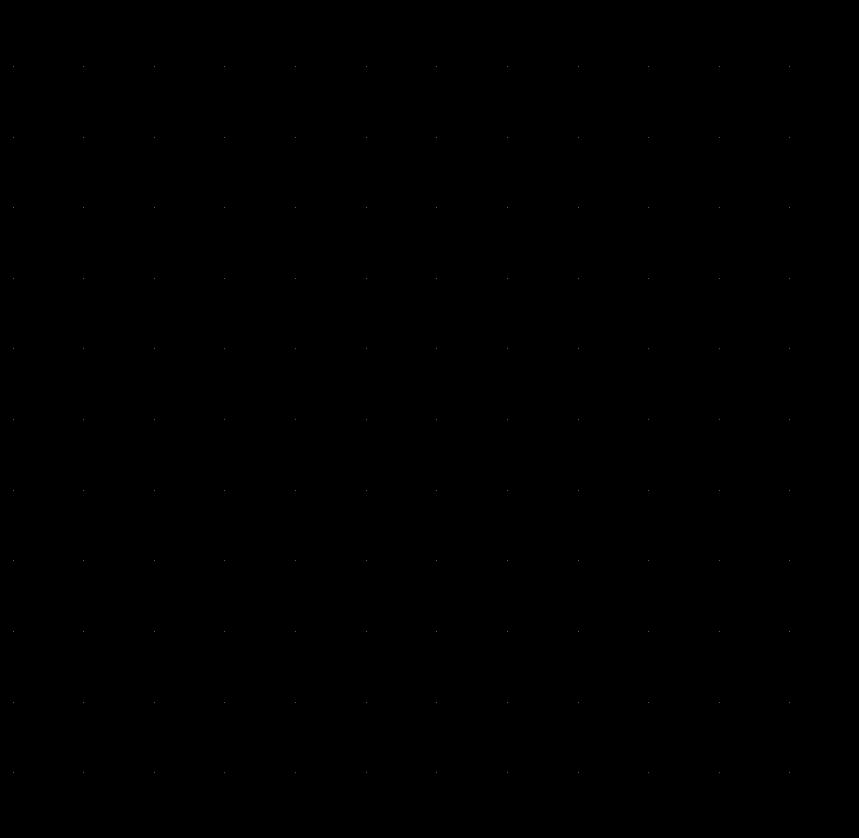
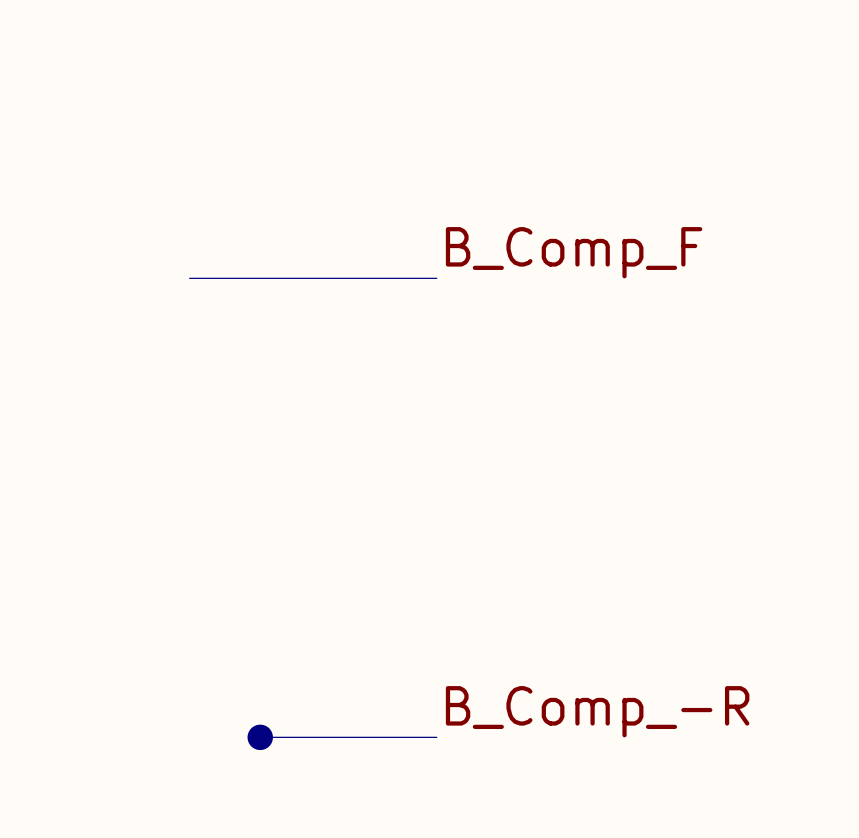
label: none -> B_Comp_F (574, 252)
wire: none -> (189, 278) (436, 278)
label: none -> B_Comp_-R (597, 711)
wire: none -> (260, 737) (436, 737)
junction: none -> (260, 737)

